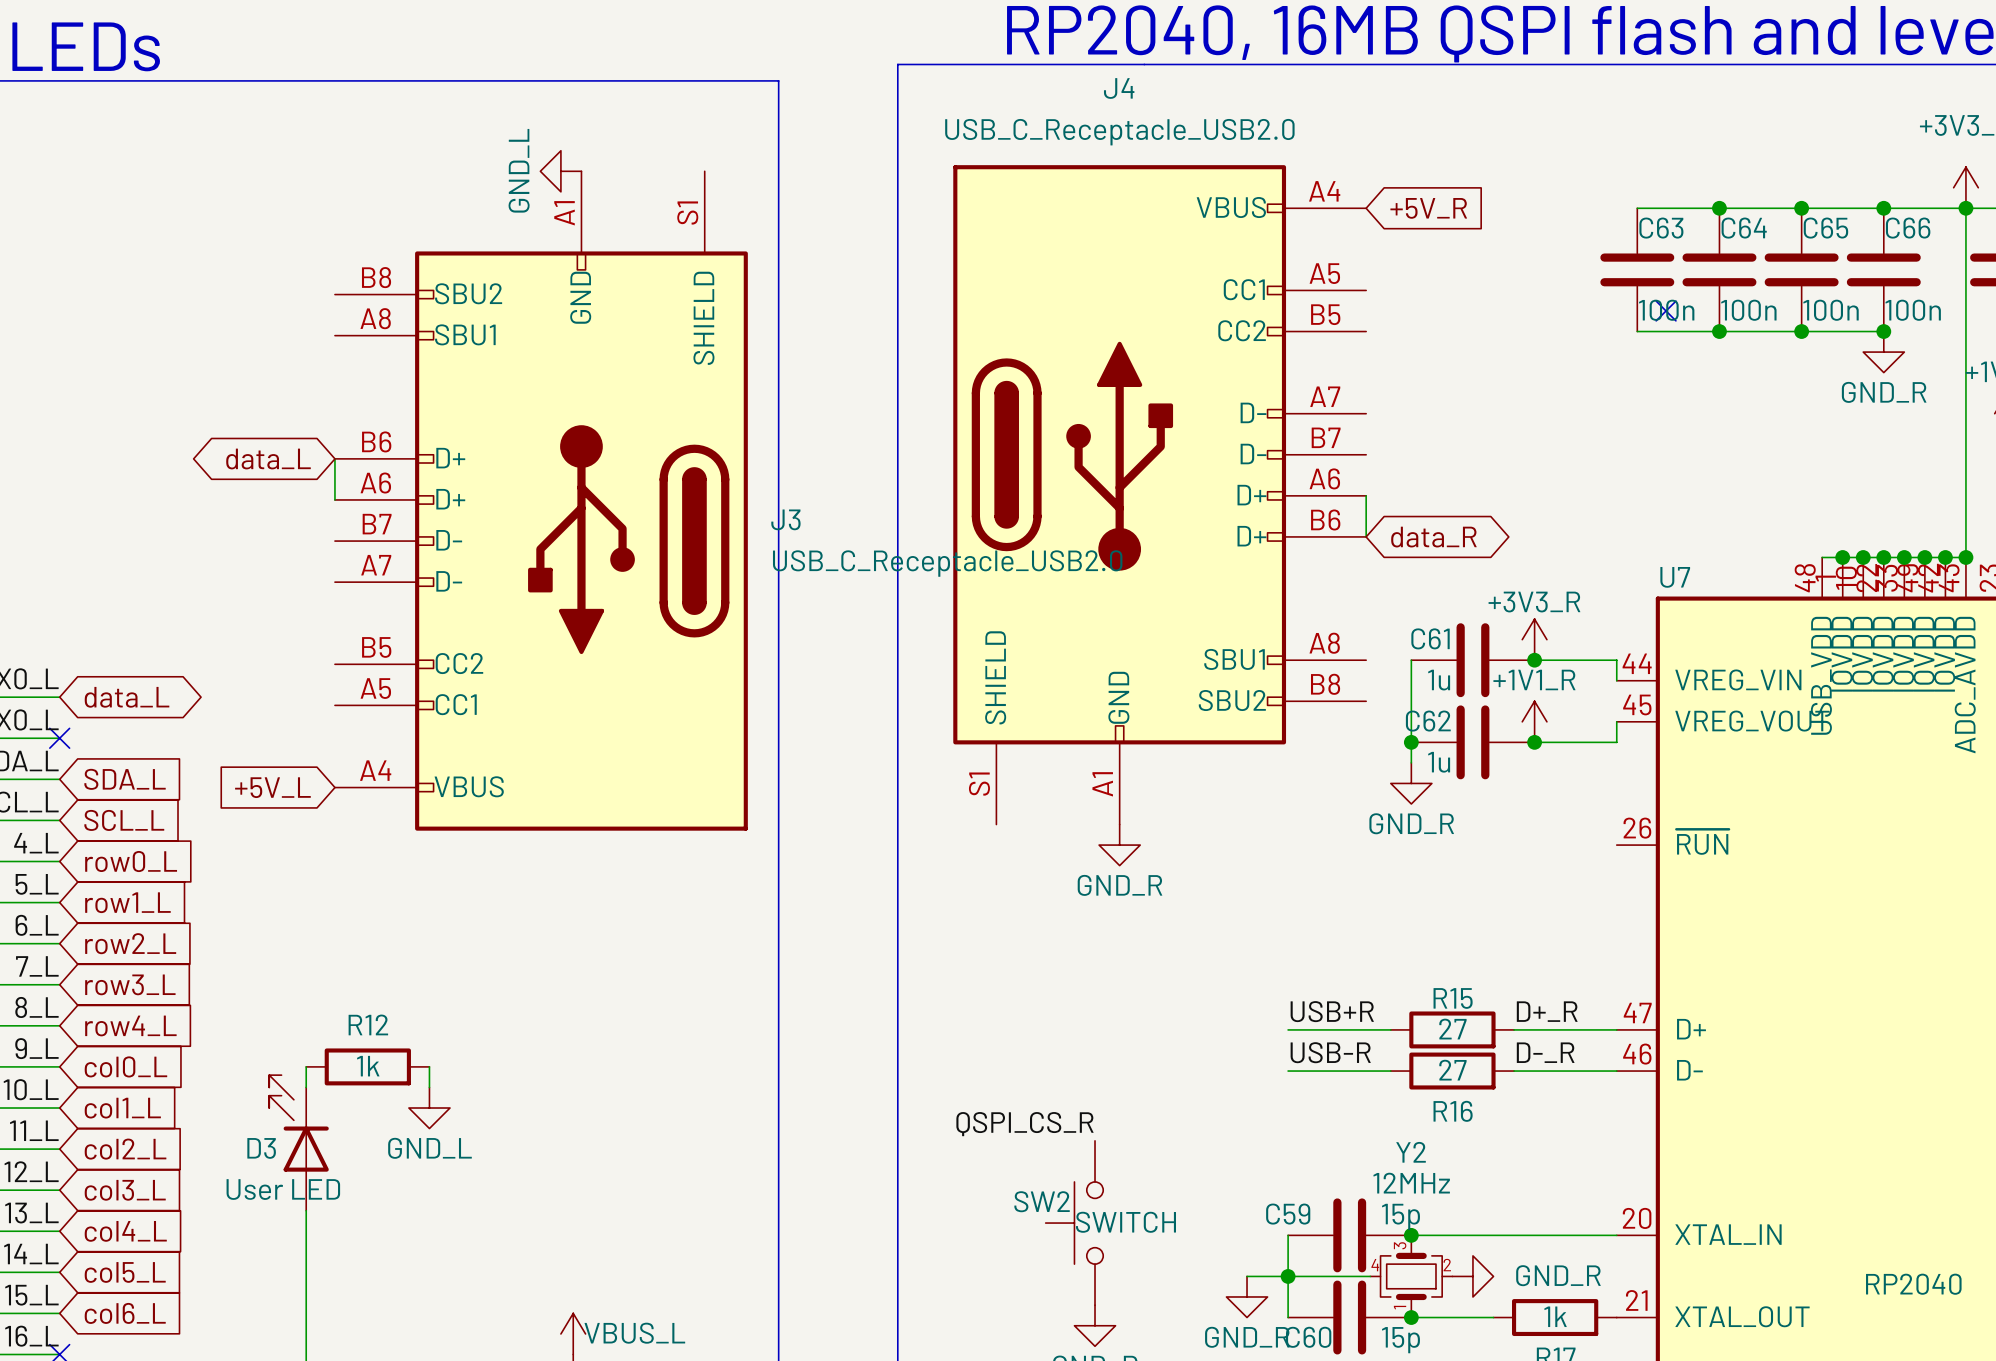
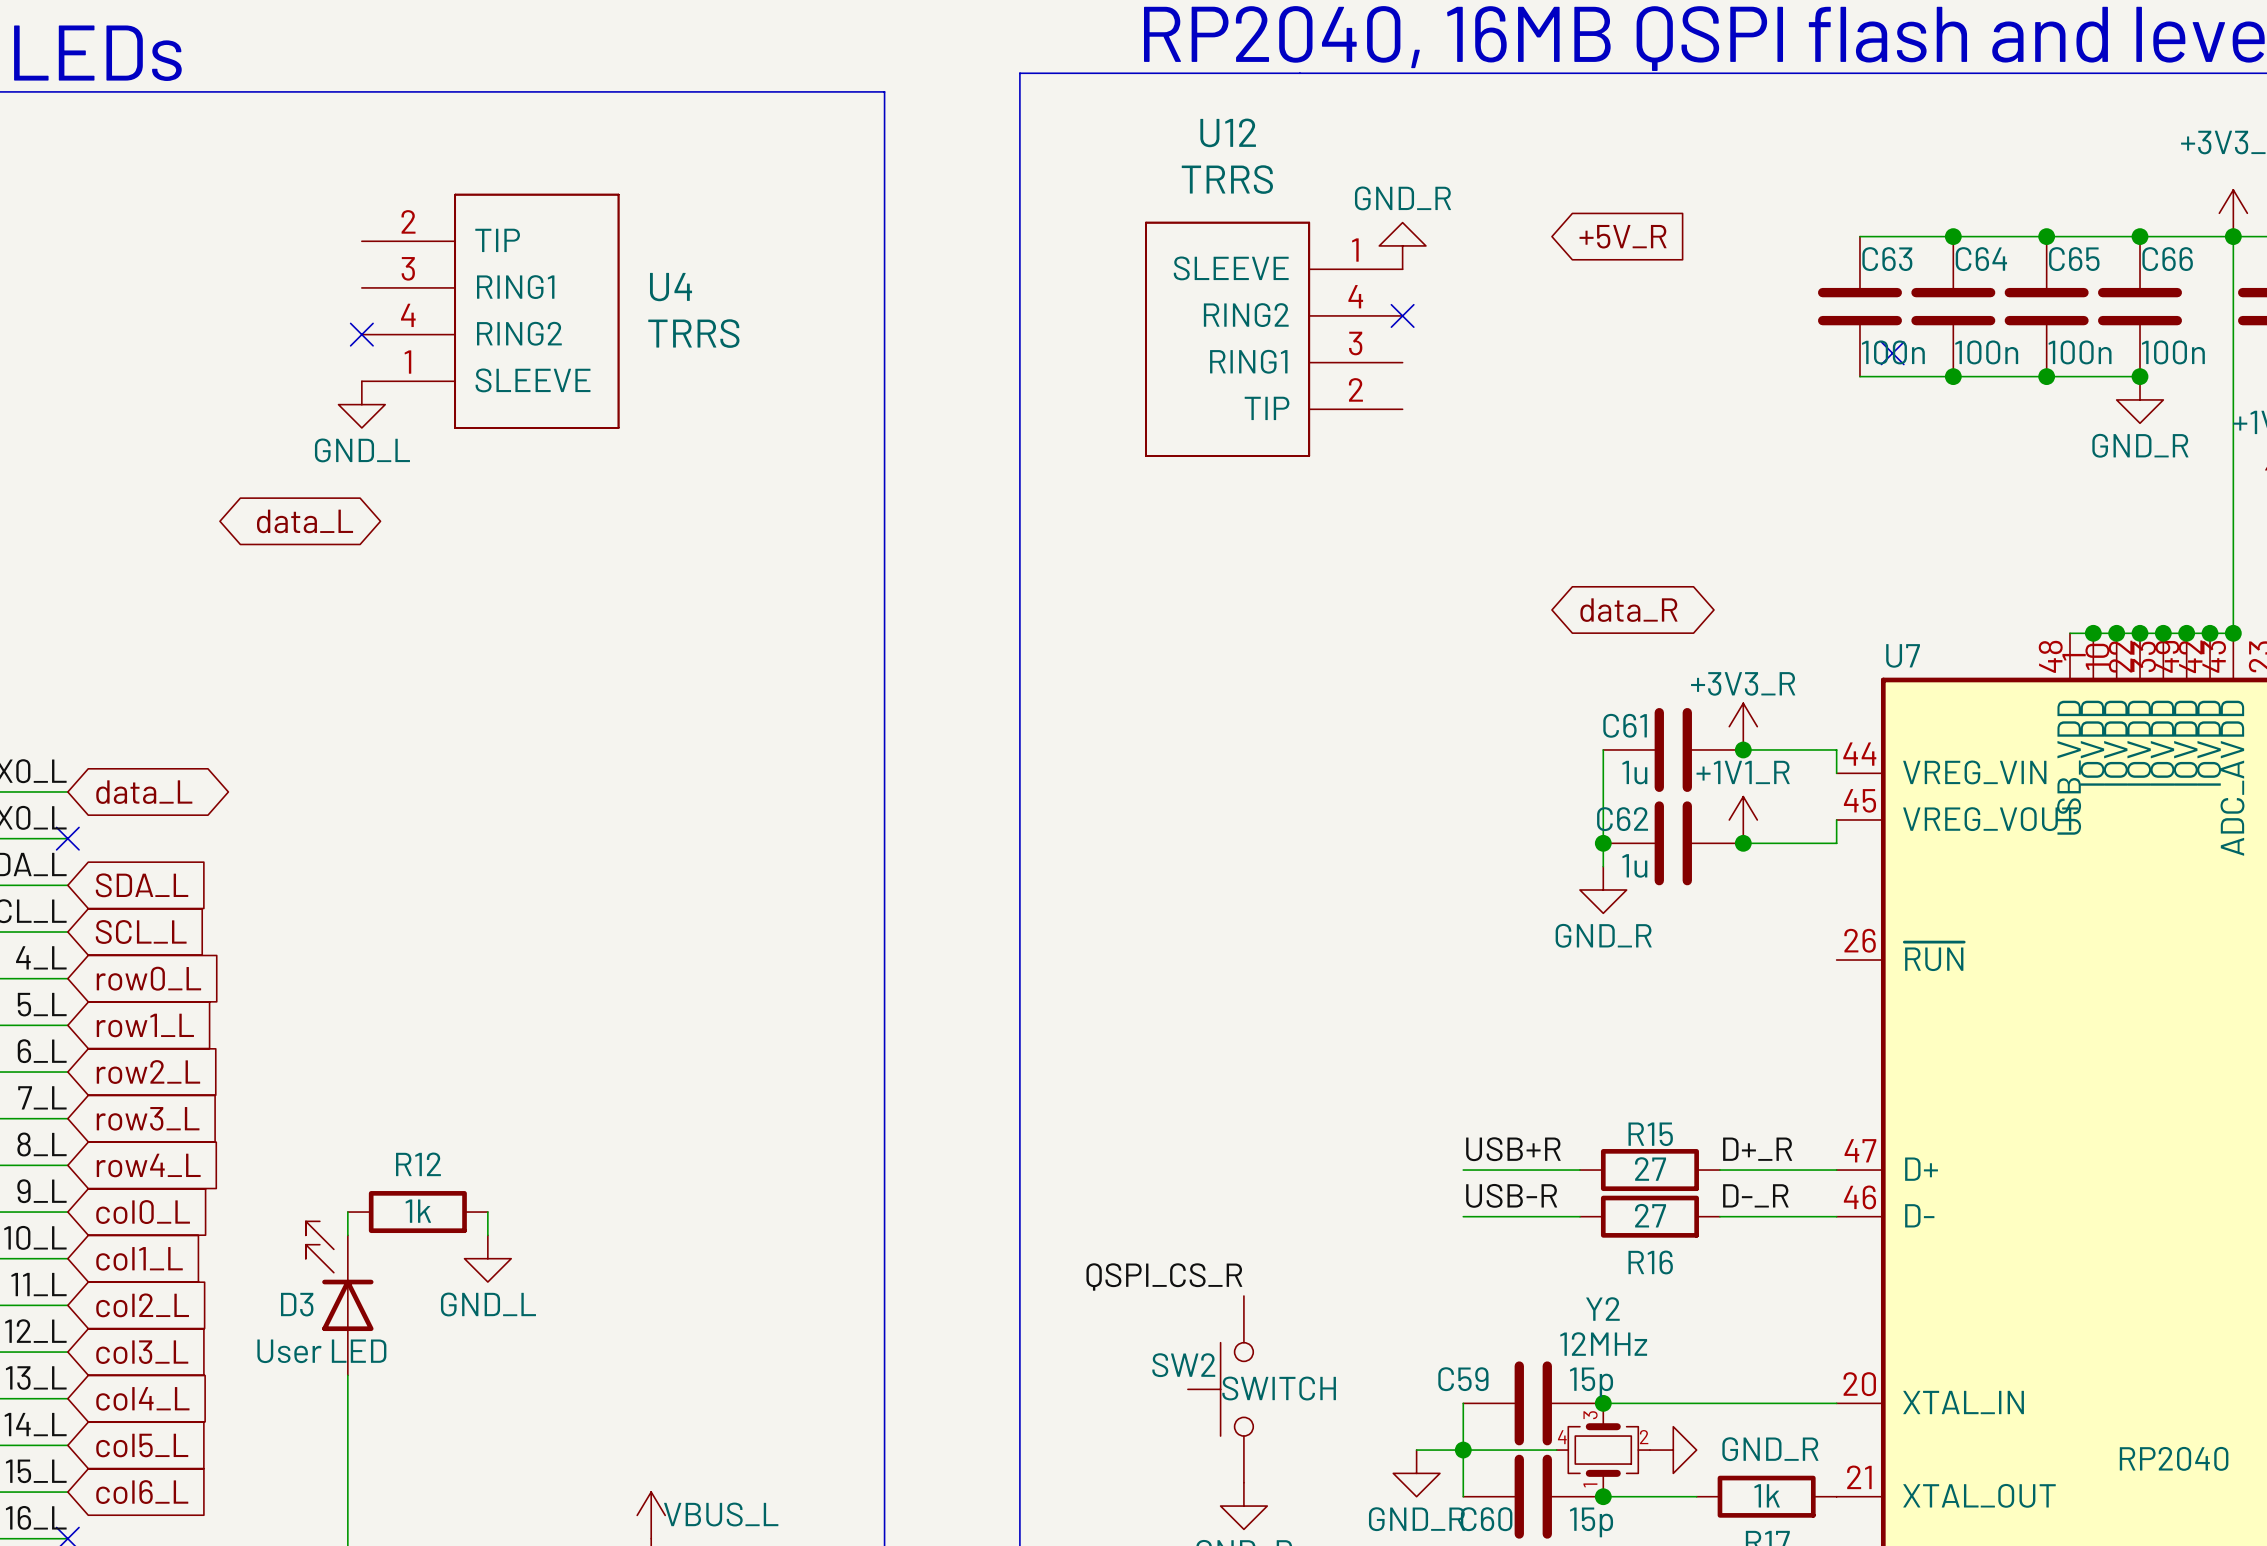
power symbol rotation: 0° (560, 171) -> 90° counterclockwise (361, 404)
power symbol position: GND_L (560, 171) -> GND_L (361, 404)
power symbol: none -> GND_R (1402, 245)
U4: none -> TRRS (490, 311)
no-connect mark: none -> (1402, 315)
no-connect mark: none -> (361, 334)
U12: none -> TRRS (1274, 339)
wire: (334, 458) (334, 499) -> none
J4: USB_C_Receptacle_USB2.0 (1159, 494) -> none
wire: (1366, 495) (1366, 536) -> none
J3: USB_C_Receptacle_USB2.0 (541, 501) -> none
global label: +5V_L (272, 787) -> none
power symbol: GND_R (1119, 845) -> none

